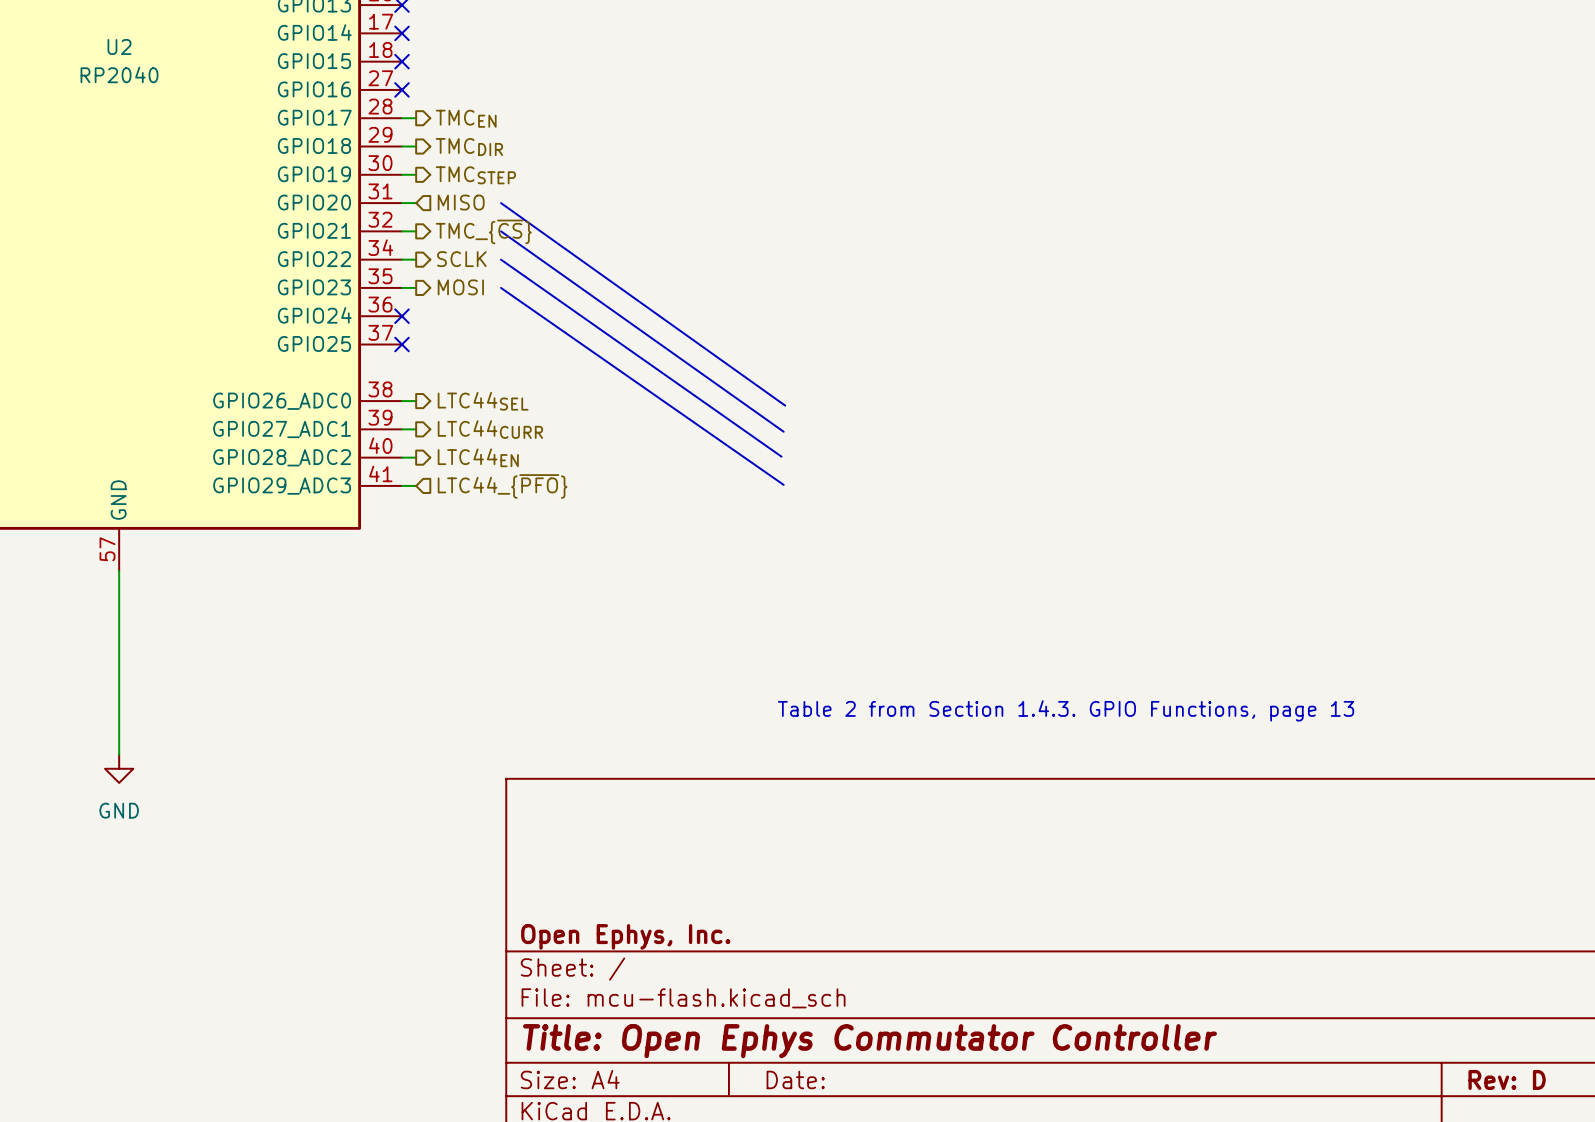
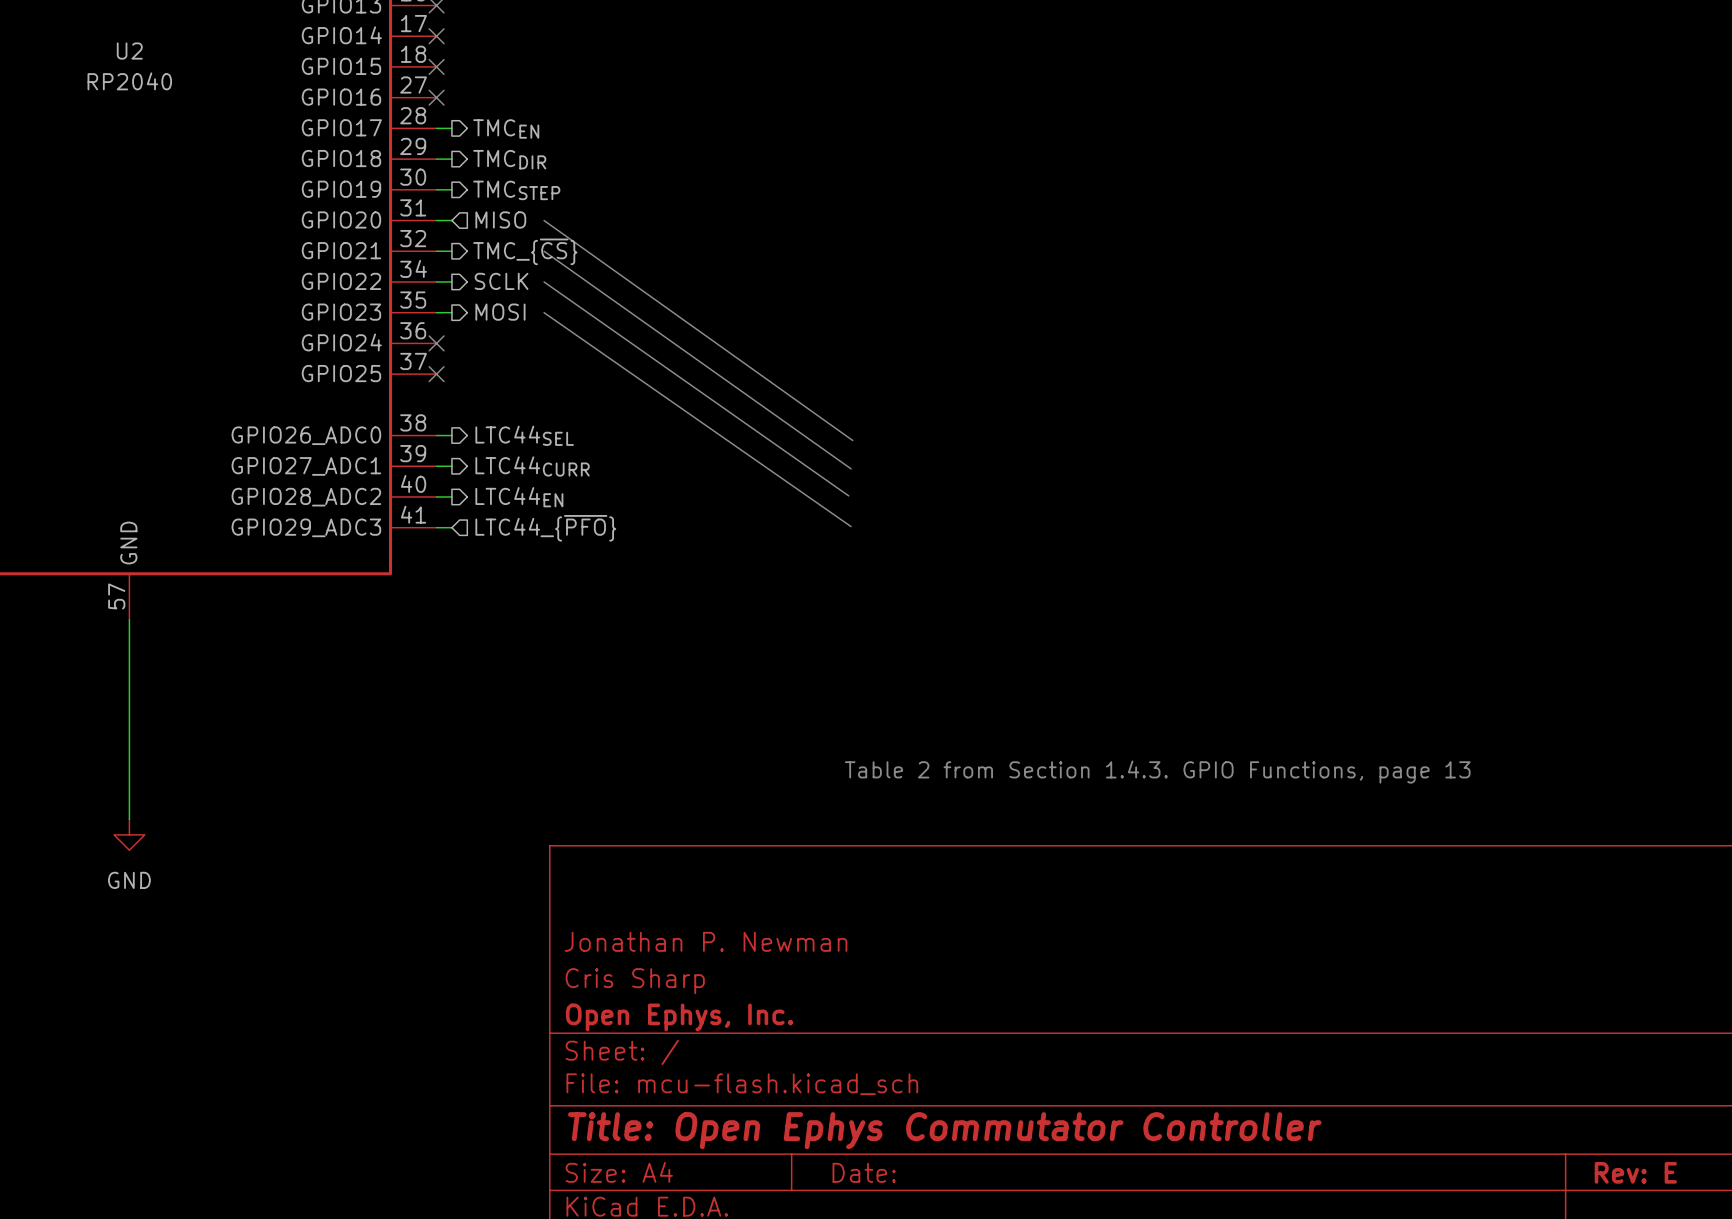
title block: none -> Jonathan P. Newman (706, 941)
title block: none -> Cris Sharp (635, 981)
title block: Rev: D (1507, 1079) -> Rev: E (1635, 1172)

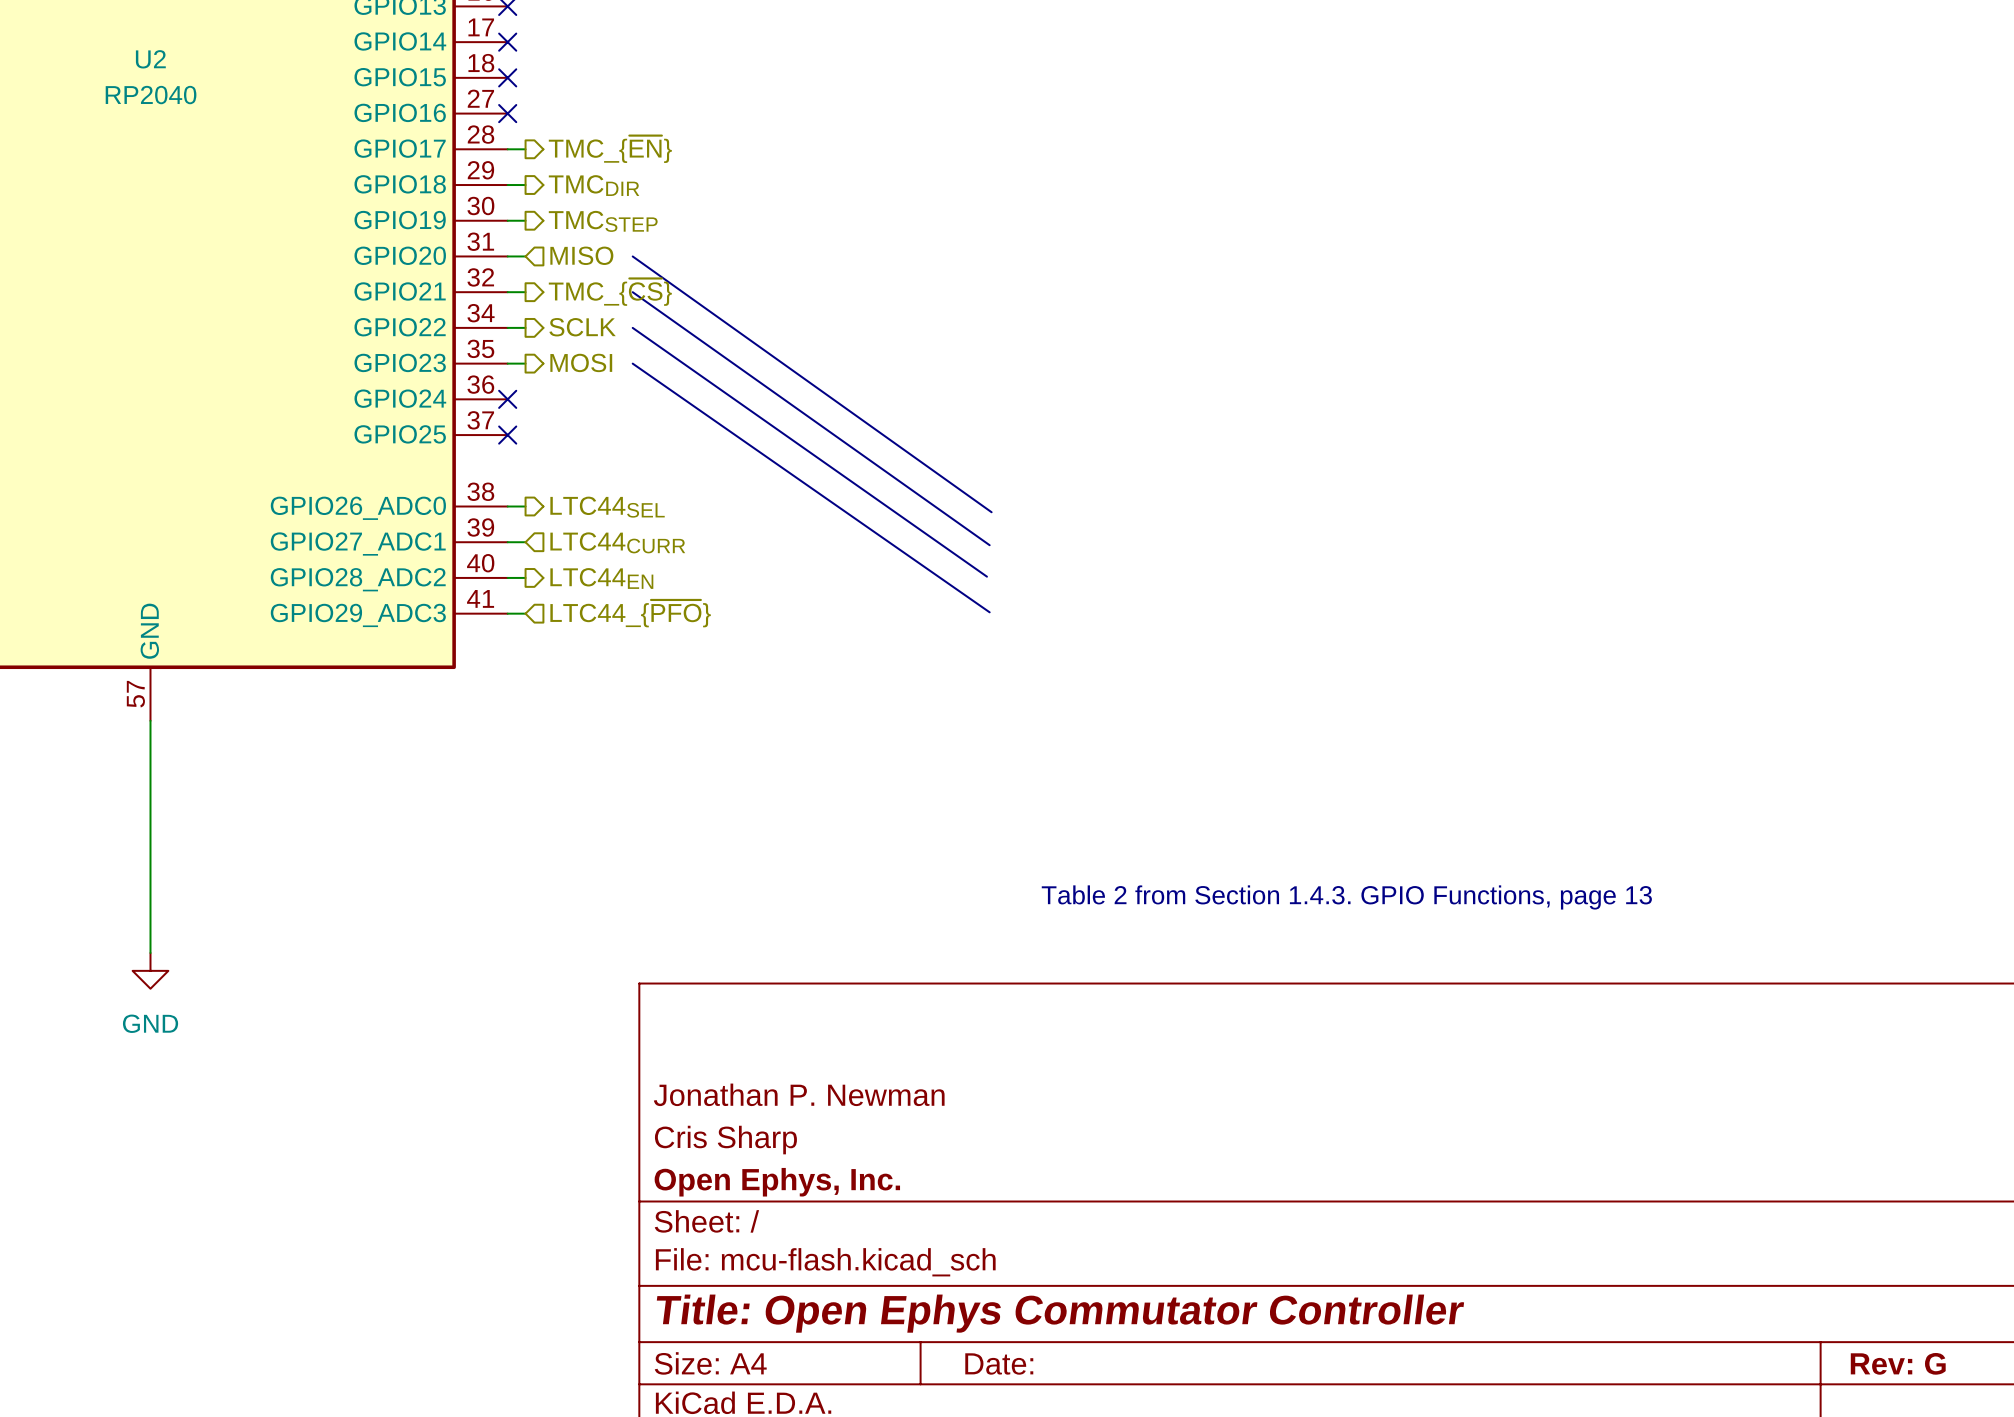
hierarchical label: TMCEN (506, 128) -> TMC_{~{EN}} (610, 149)
hierarchical label shape: output (532, 466) -> input (617, 542)
title block: Rev: E (1635, 1172) -> Rev: G (1898, 1363)

